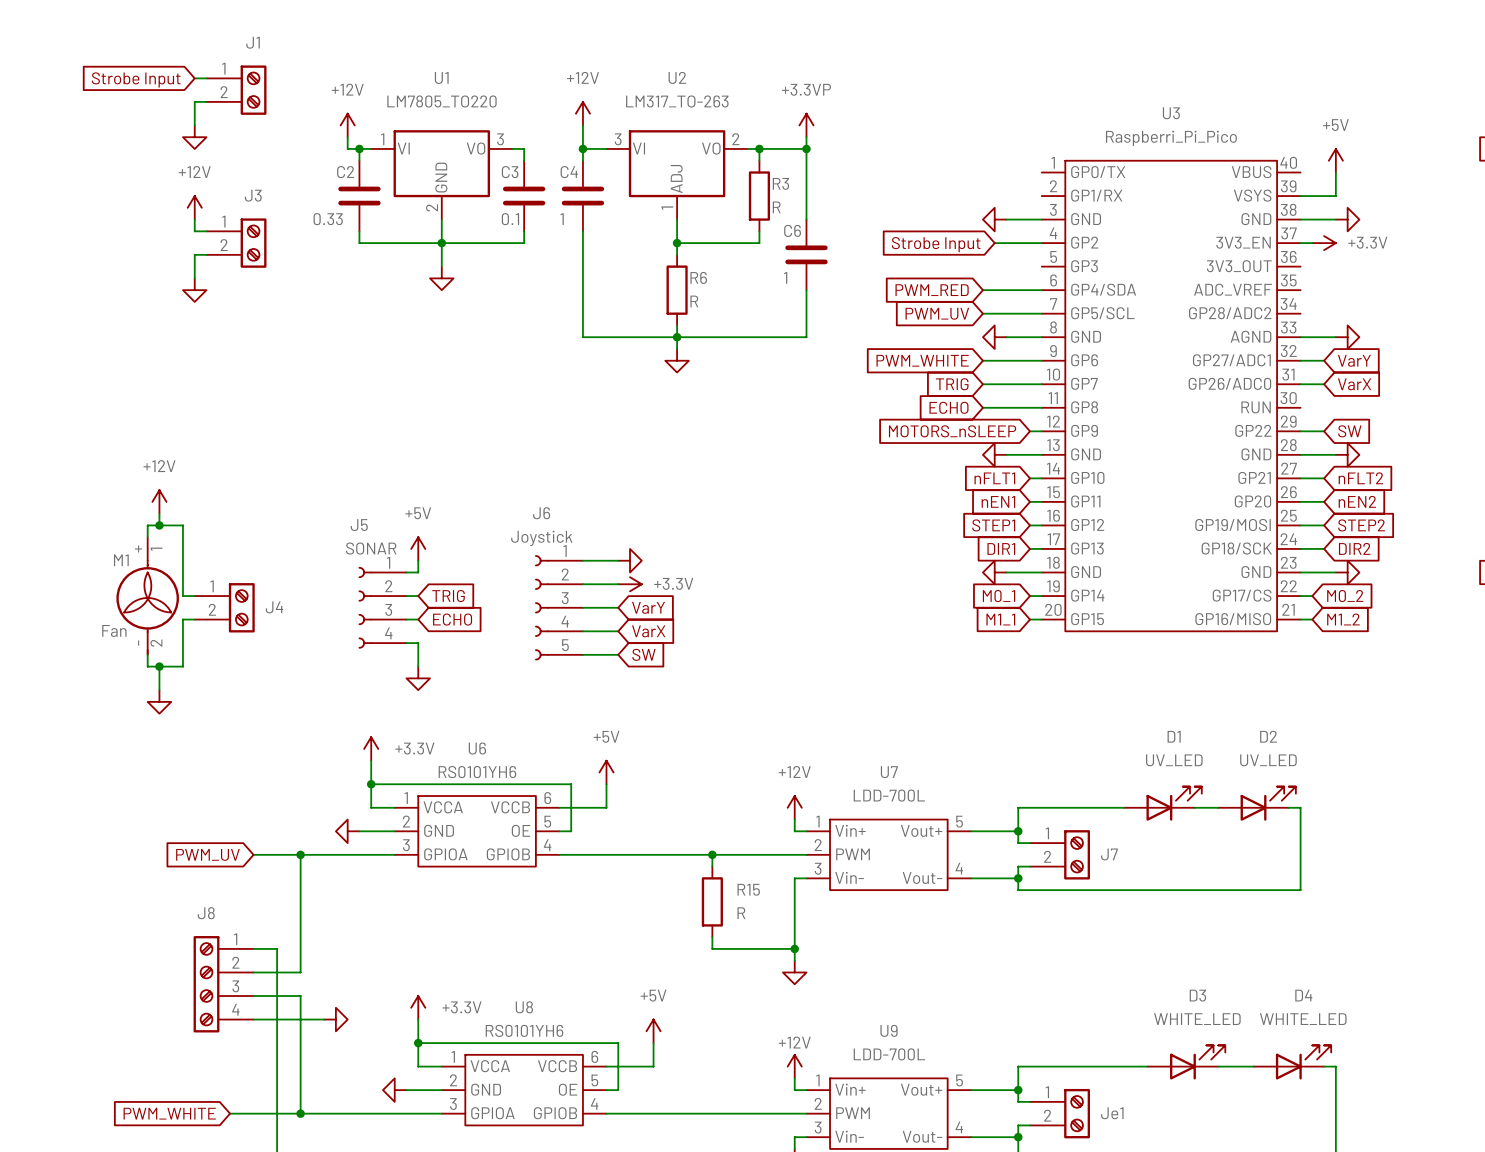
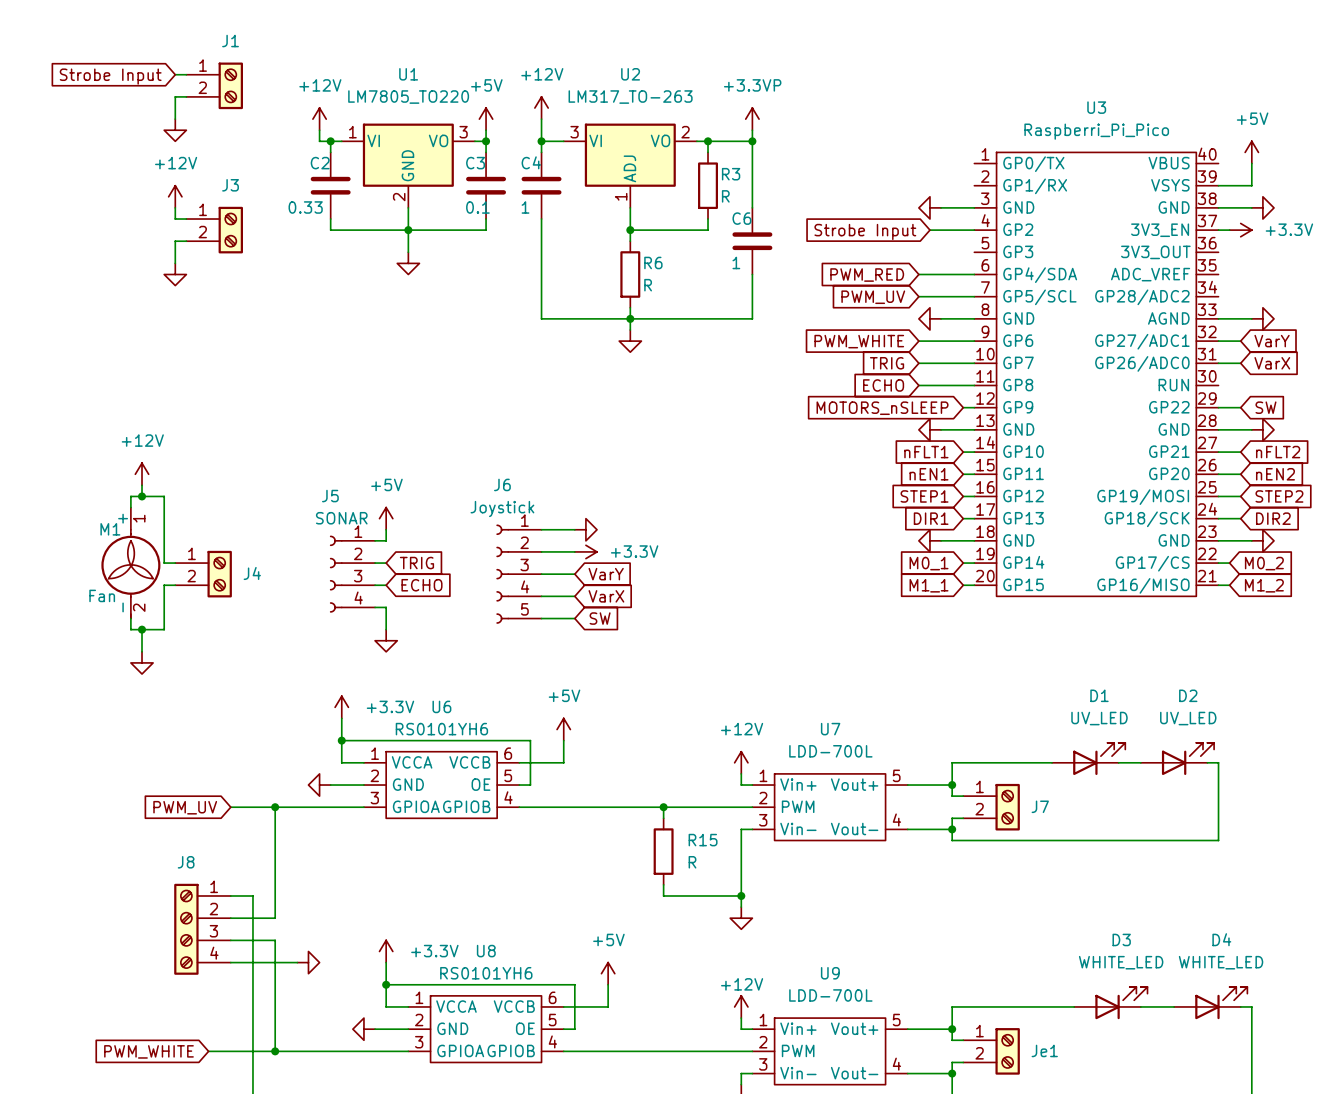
power symbol: none -> +5V (486, 119)
wire: none -> (486, 130) (486, 141)
junction: none -> (486, 141)

